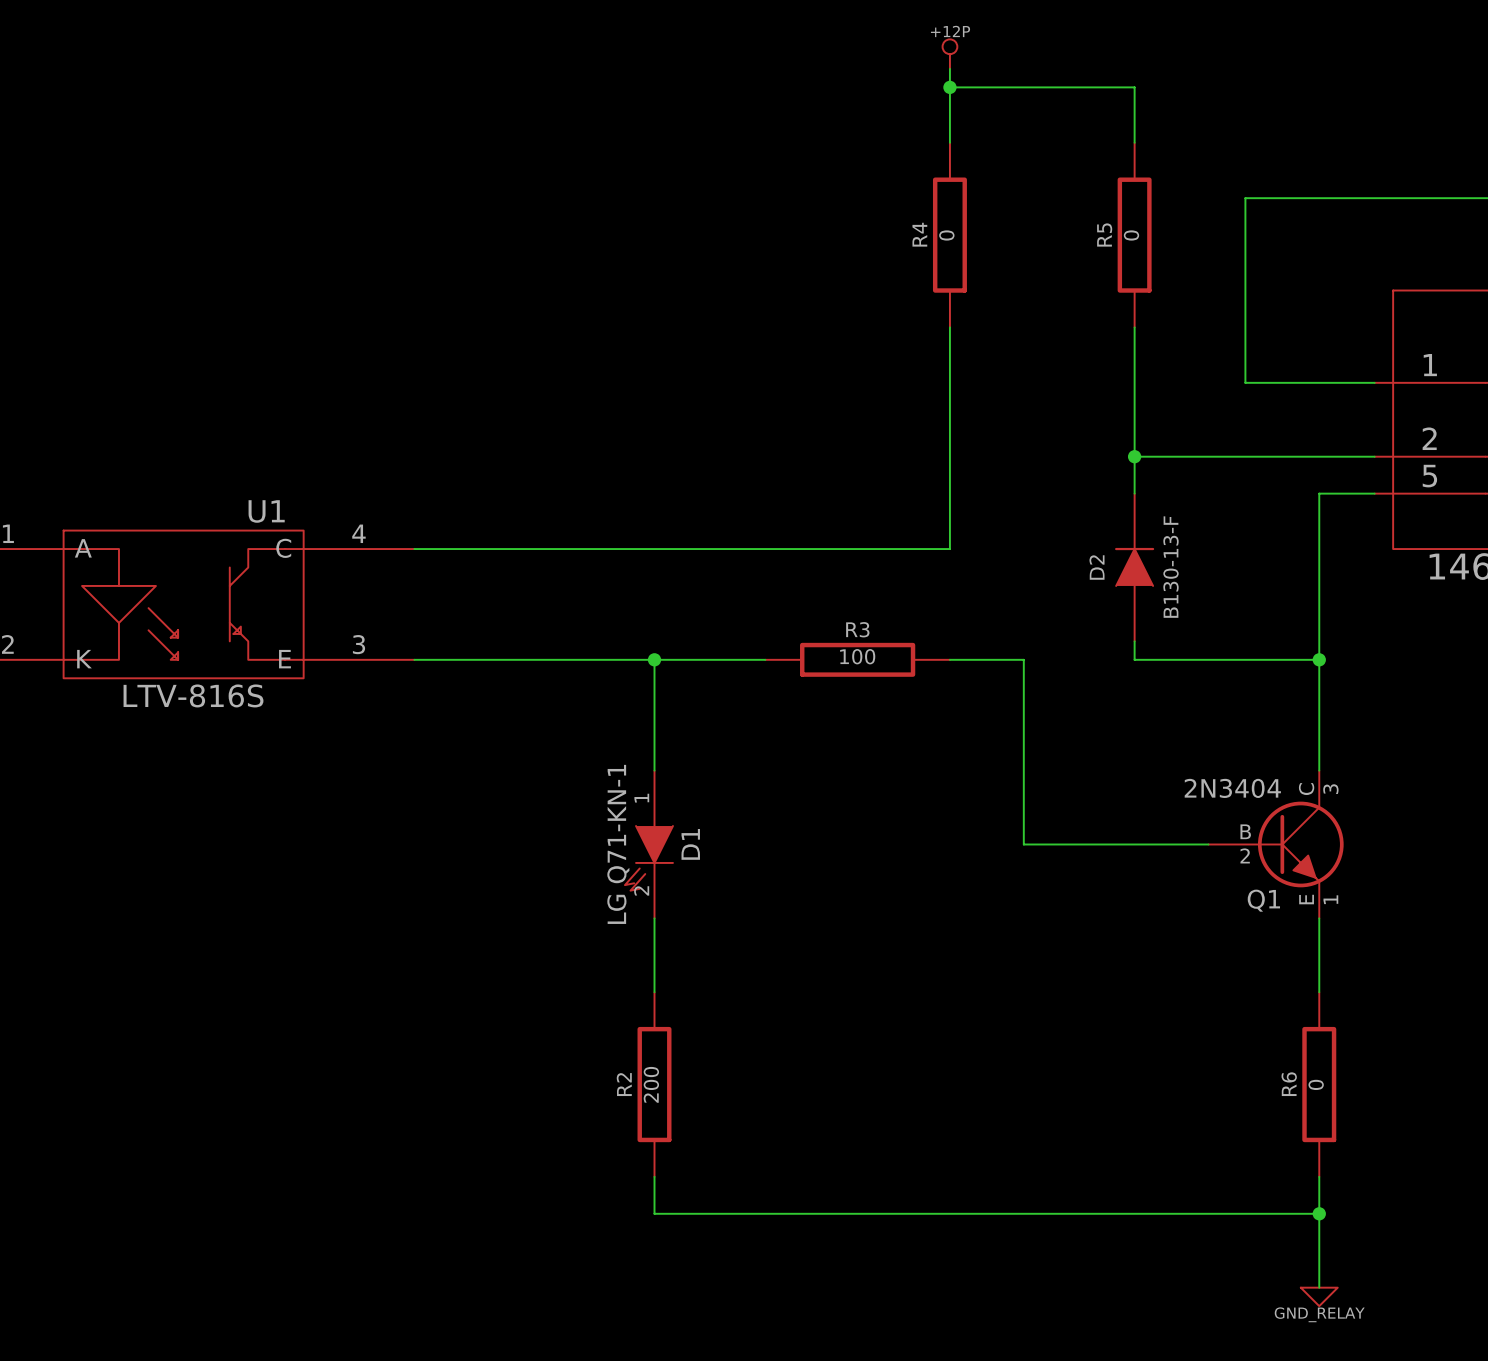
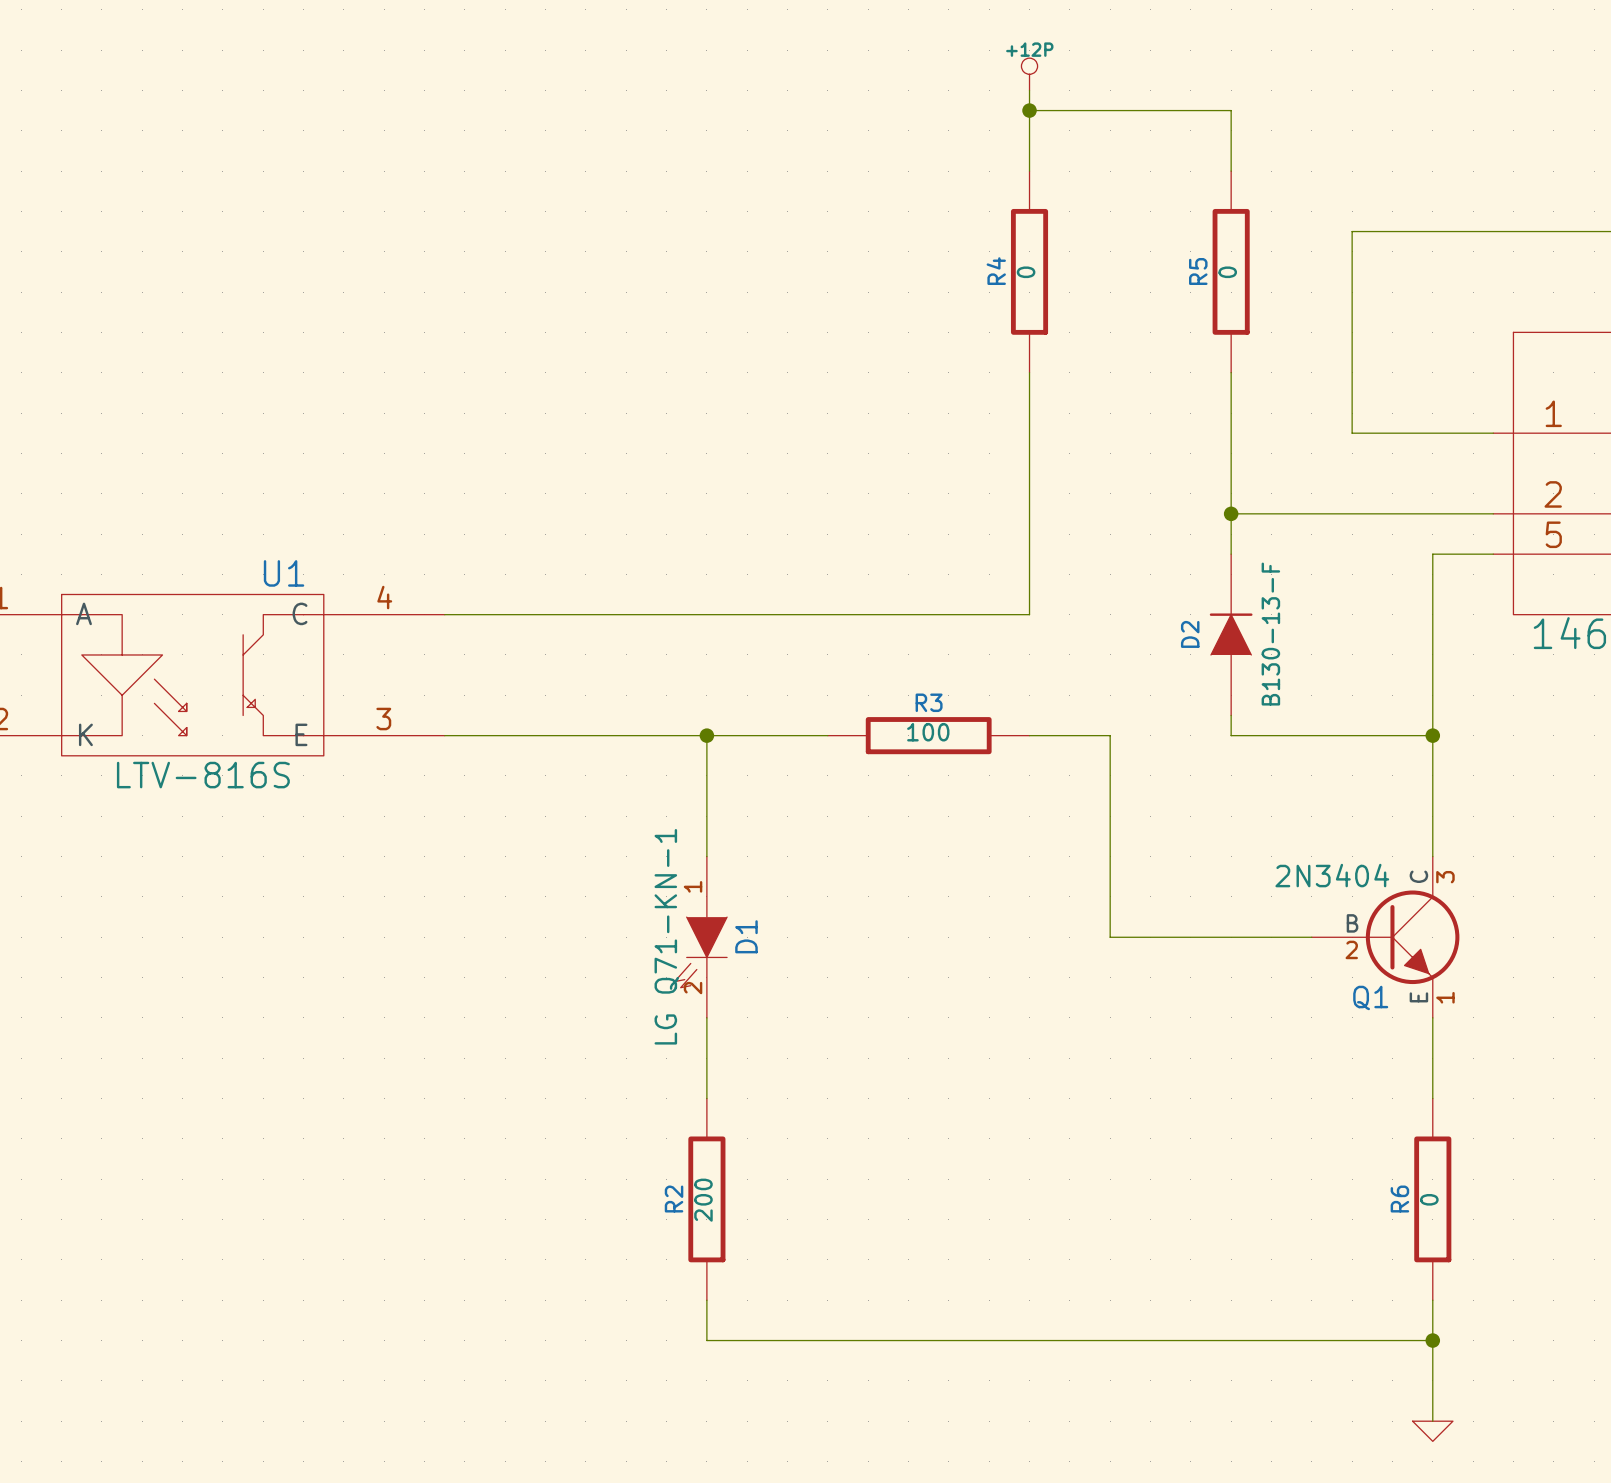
power symbol text: GND_RELAY (1319, 1314) -> none

